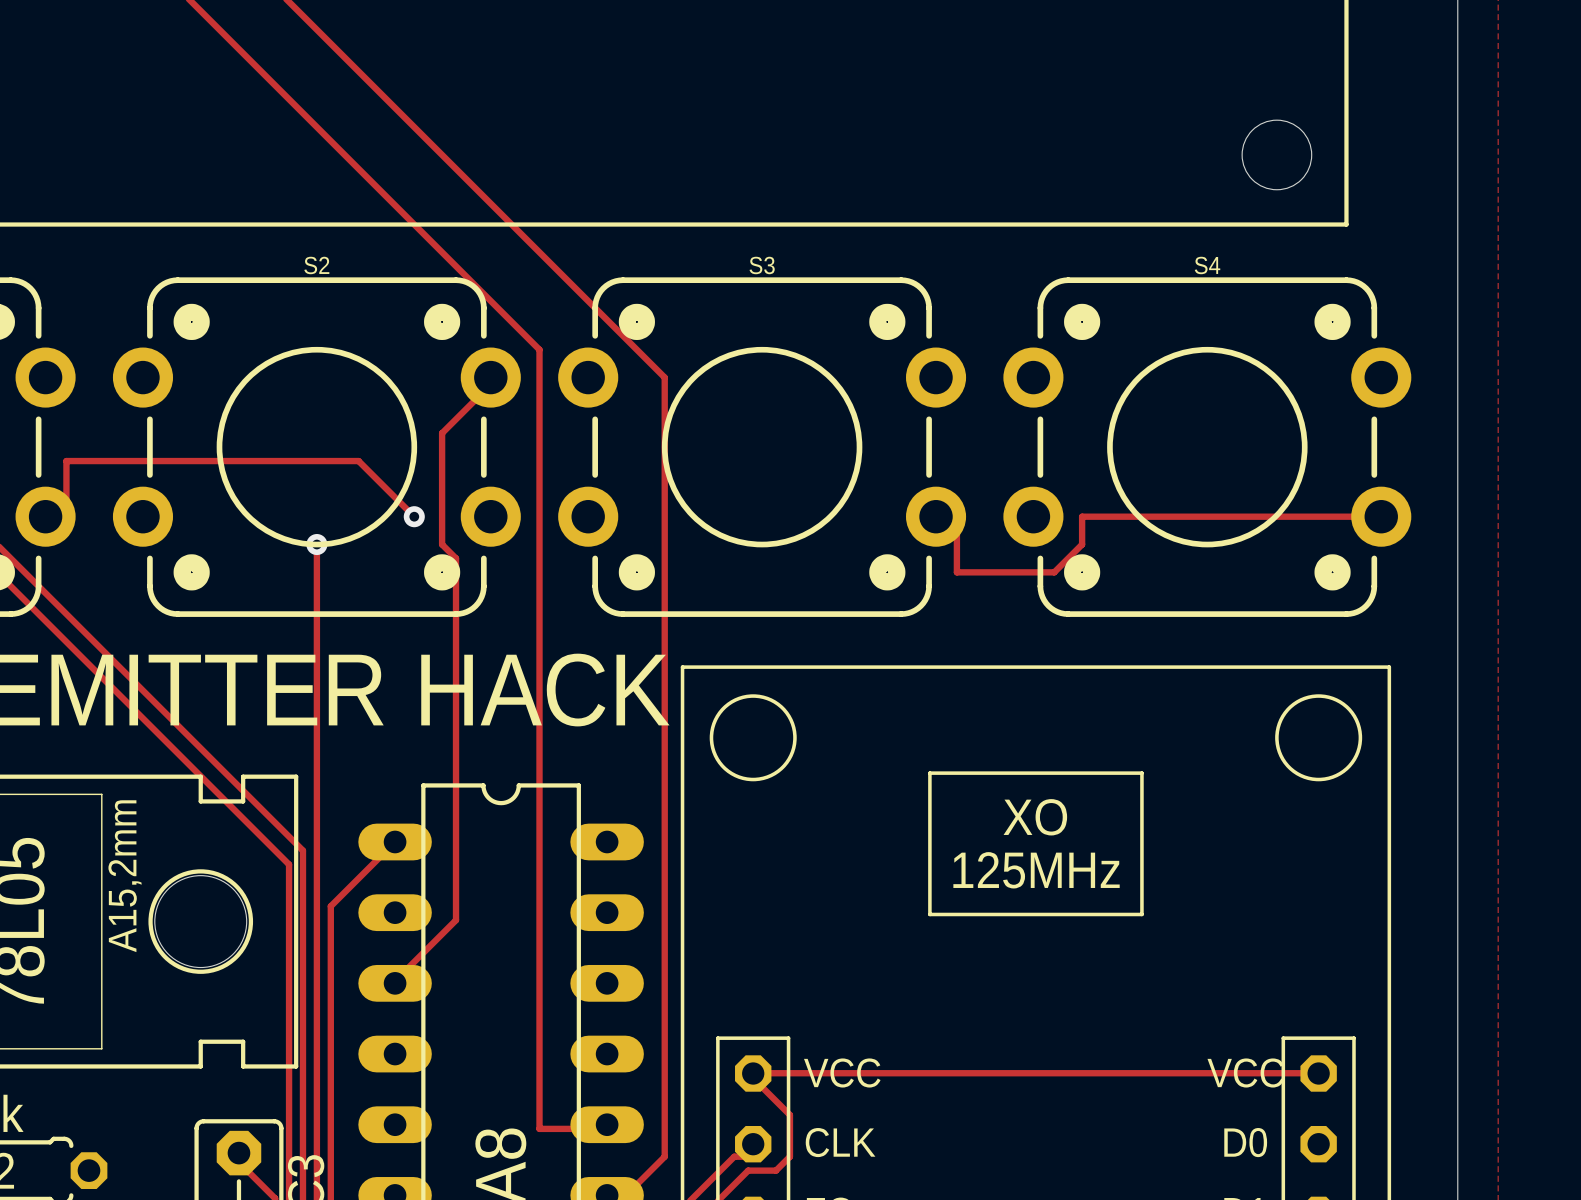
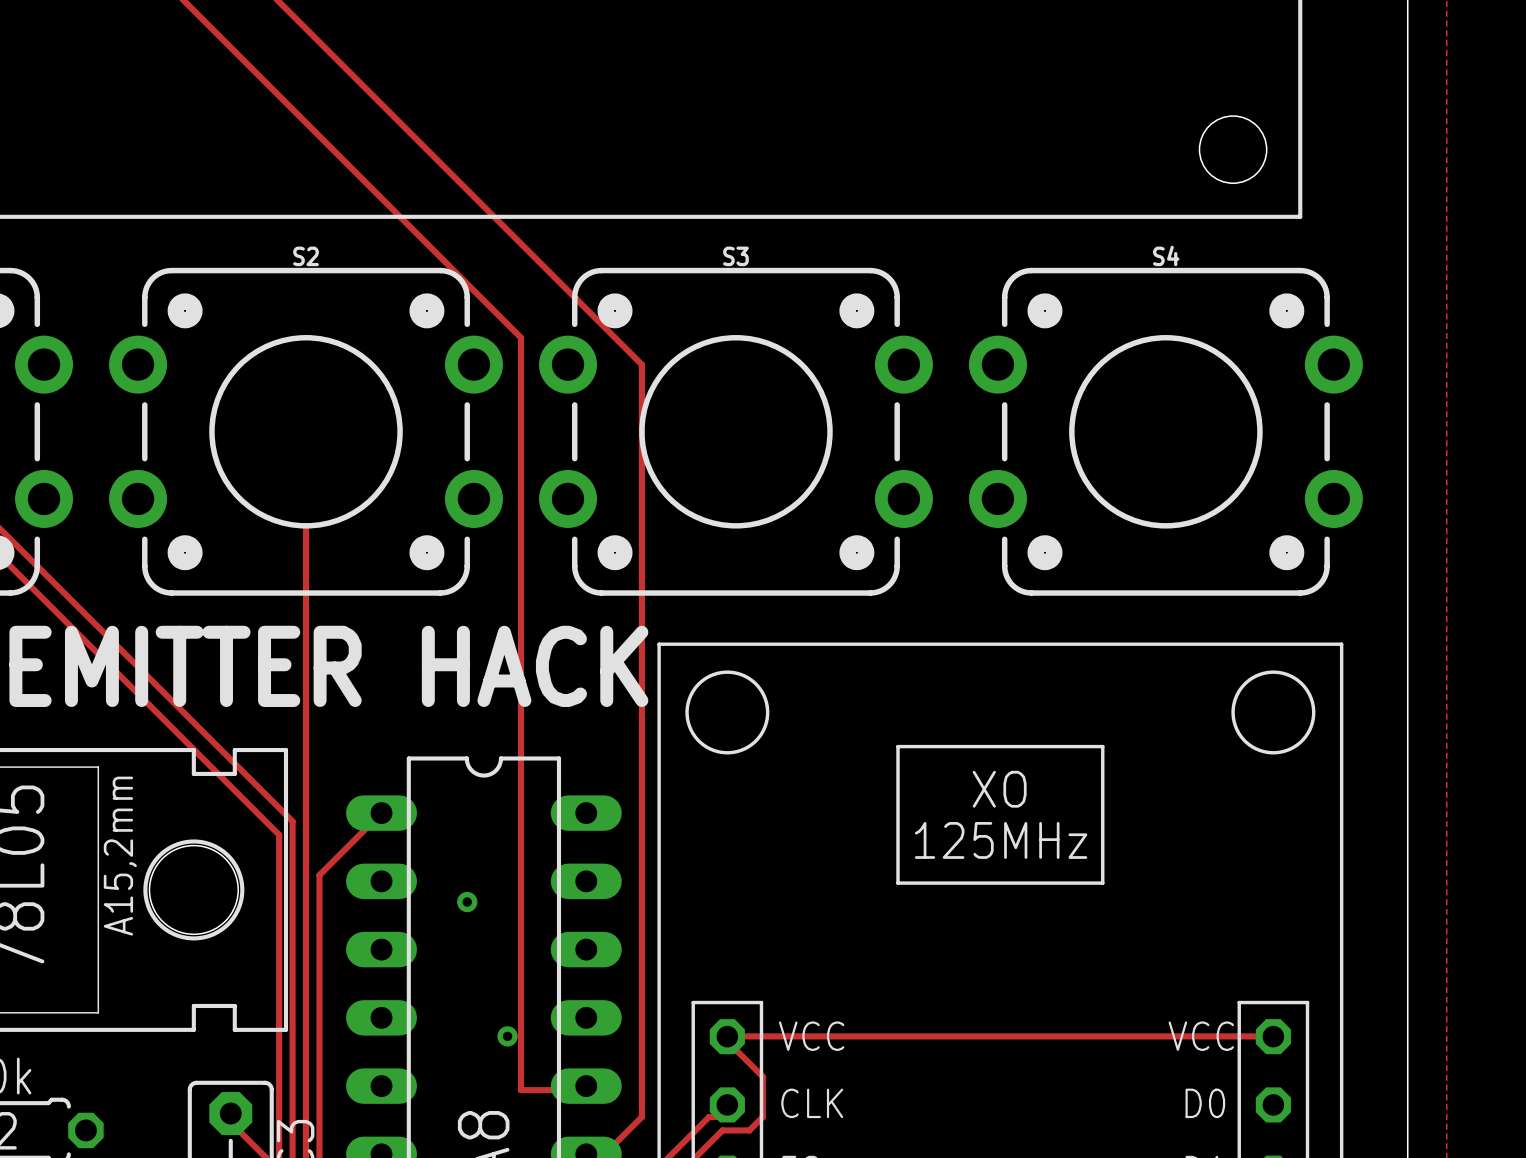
track: (490, 377) (483, 377) (483, 391) (442, 433) (442, 544) (456, 558) (456, 920) (395, 983) -> none
track: (45, 516) (52, 516) (66, 502) (66, 461) (358, 461) (414, 516) -> none
via: (414, 516) -> none
track: (936, 516) (942, 516) (956, 530) (956, 572) (1054, 572) (1082, 544) (1082, 516) (1381, 516) -> none
via: (316, 544) -> none
via: none -> (467, 902)
via: none -> (507, 1036)

